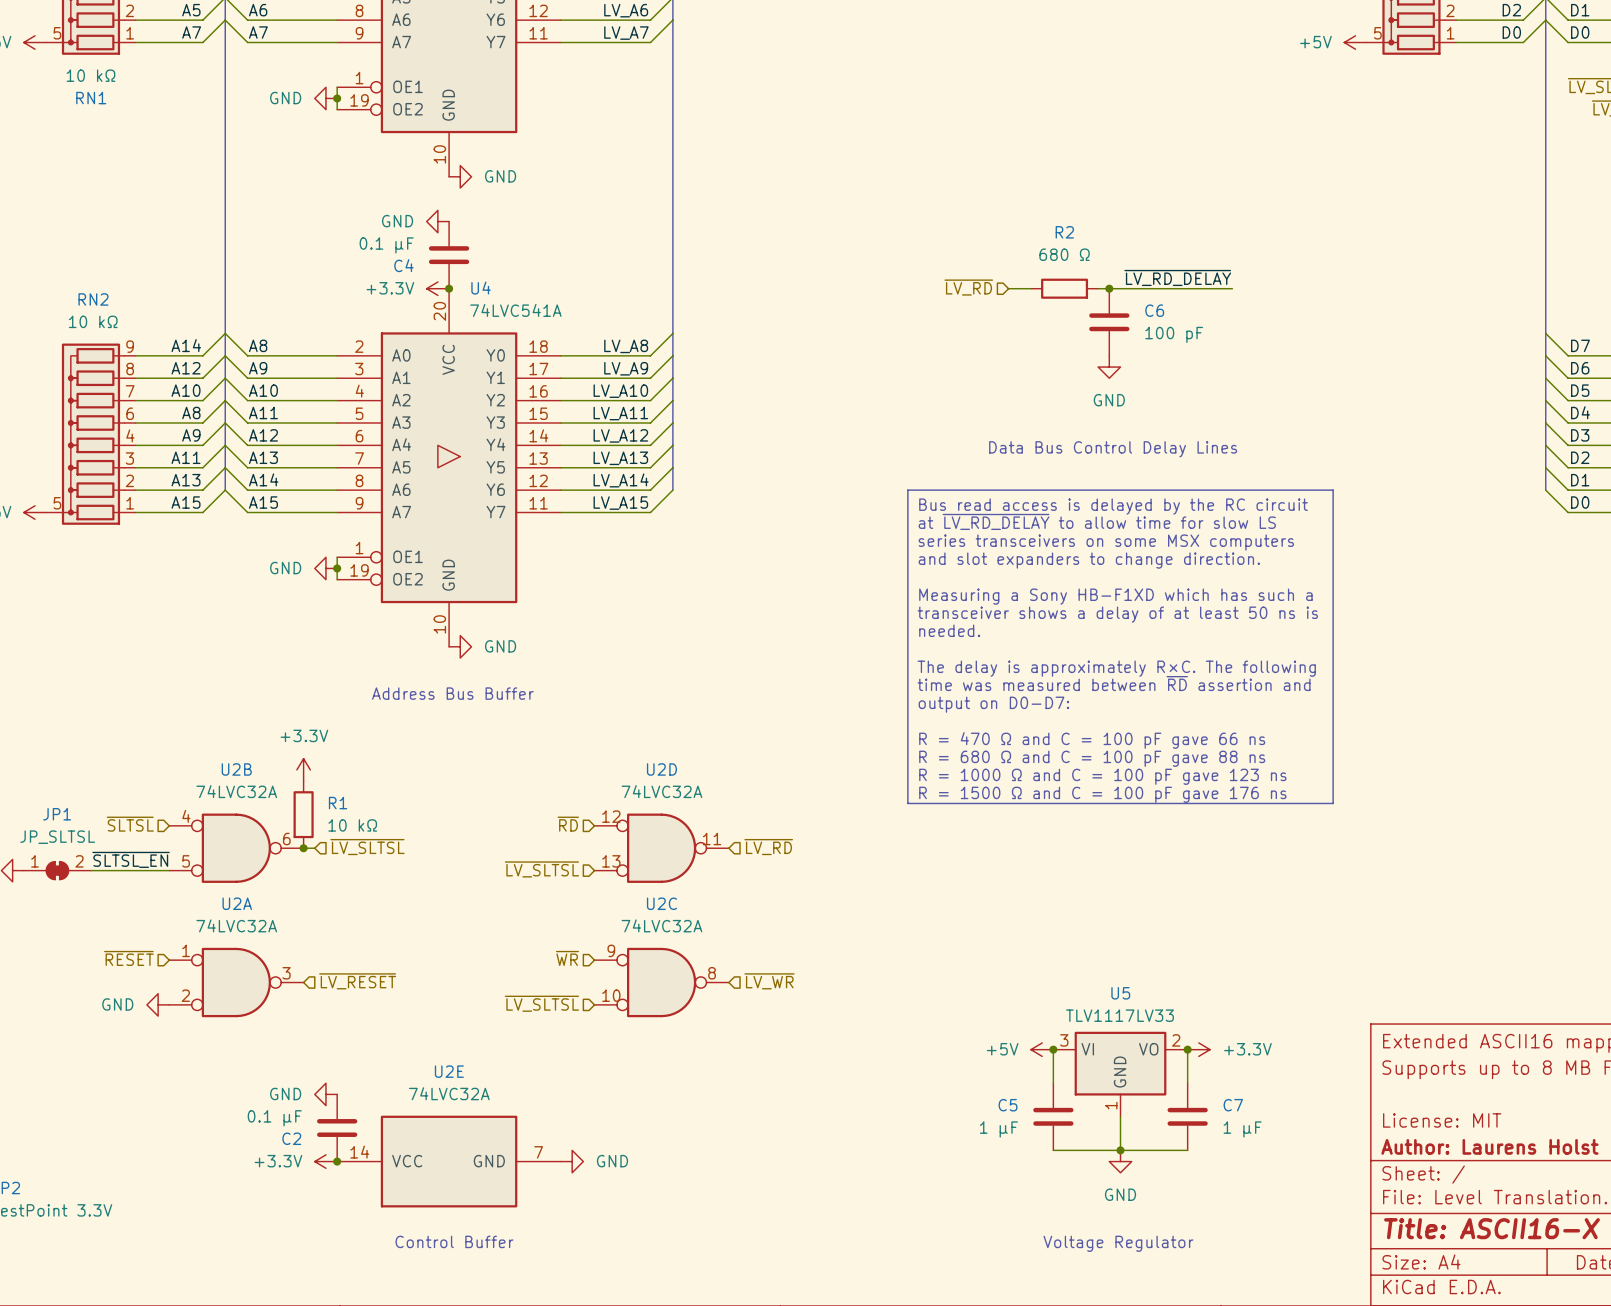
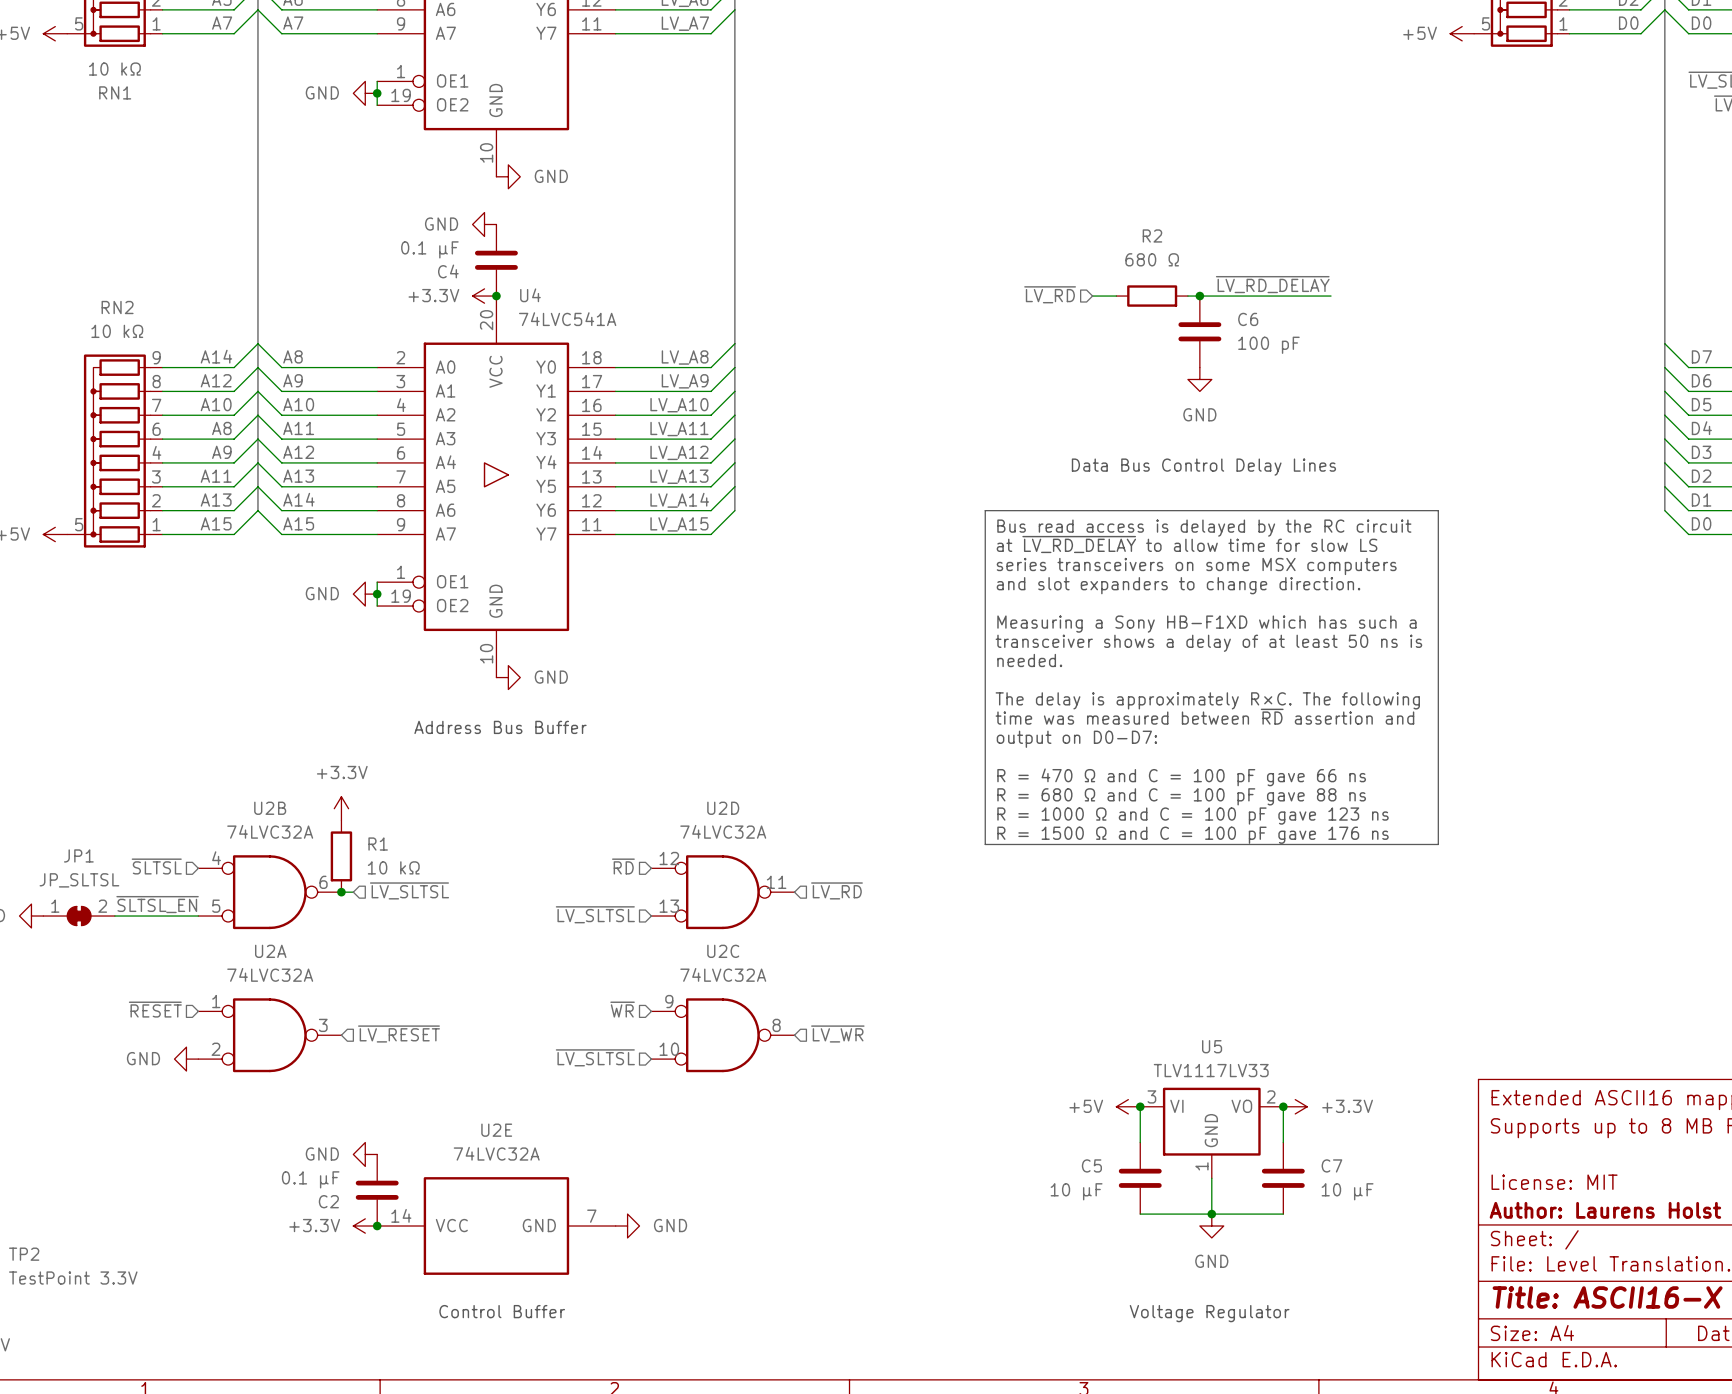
C5 value: 1 µF (998, 1129) -> 10 µF (1076, 1191)
C7 value: 1 µF (1242, 1129) -> 10 µF (1347, 1191)

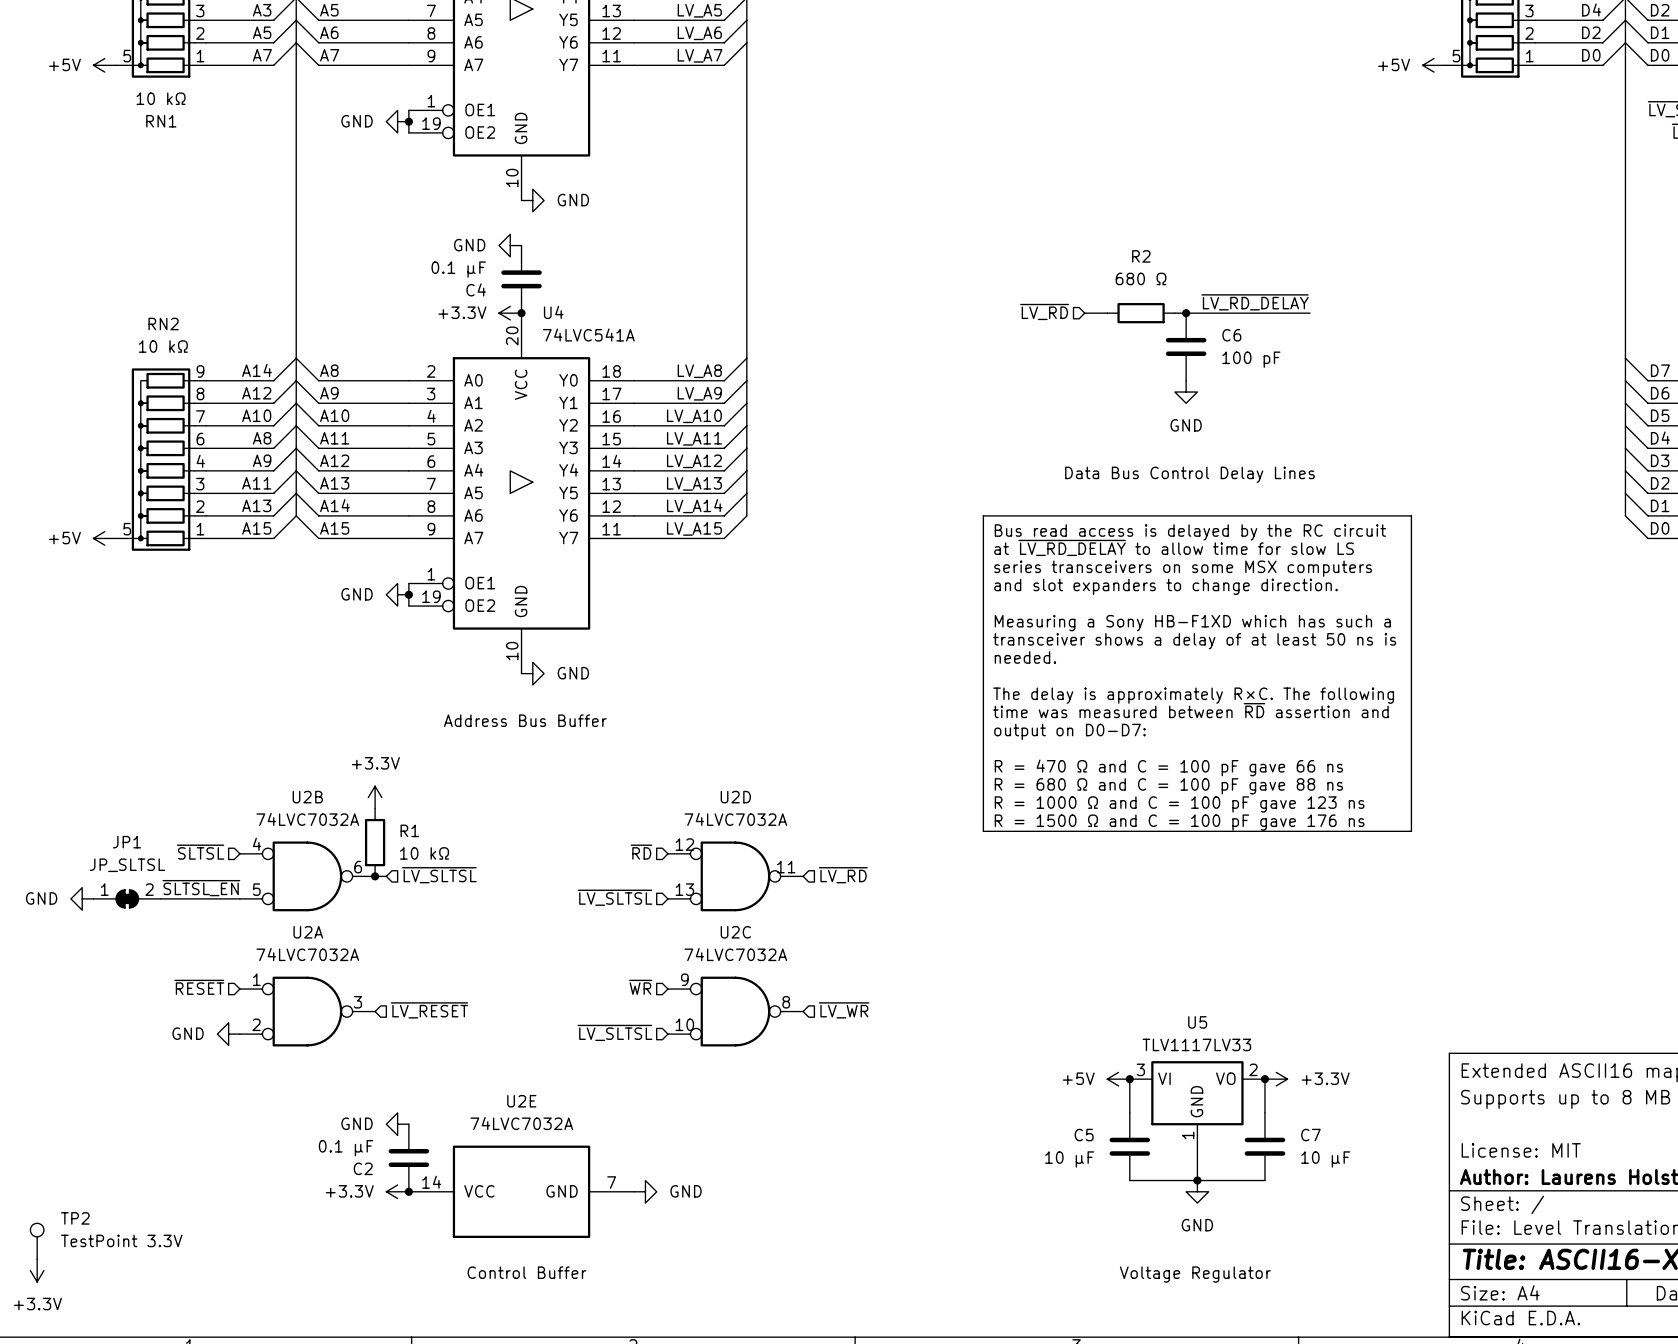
U2B value: 74LVC32A (270, 831) -> 74LVC7032A (307, 819)
U2D value: 74LVC32A (723, 831) -> 74LVC7032A (735, 819)
U2A value: 74LVC32A (270, 974) -> 74LVC7032A (307, 954)
U2C value: 74LVC32A (723, 974) -> 74LVC7032A (735, 954)
U2E value: 74LVC32A (496, 1153) -> 74LVC7032A (521, 1123)

